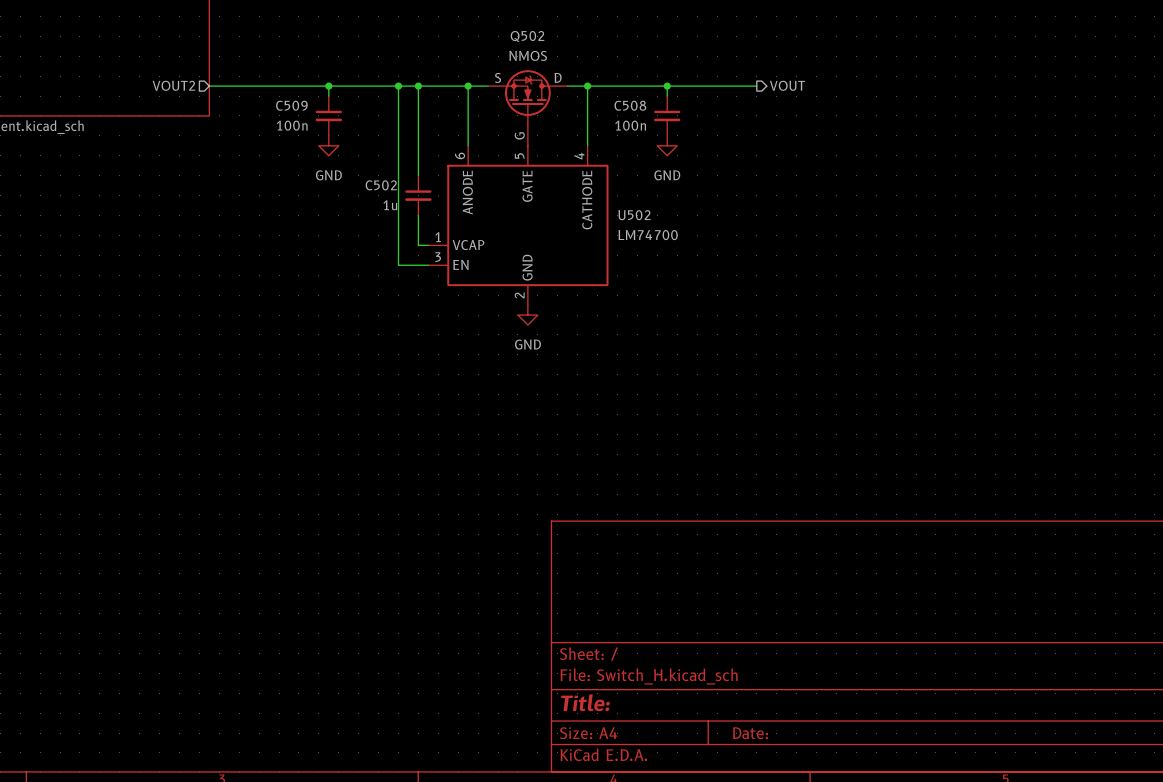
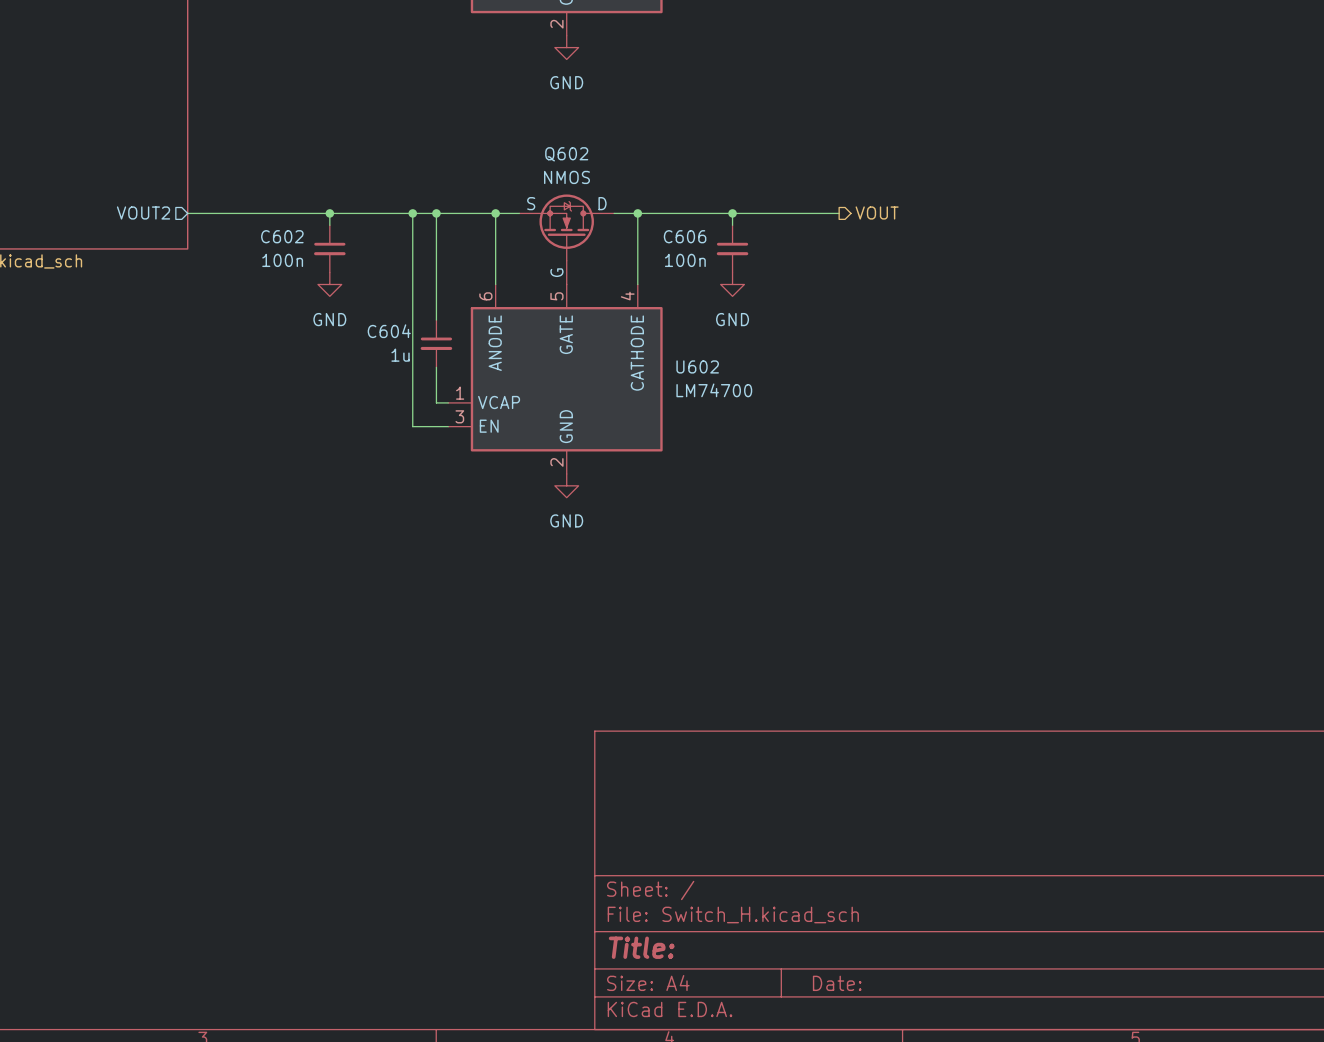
Q502 name: Q502 (527, 36) -> Q602 (566, 154)
C509 name: C509 (291, 105) -> C602 (282, 236)
C508 name: C508 (630, 105) -> C606 (685, 236)
C502 name: C502 (381, 185) -> C604 (389, 331)
U502 name: U502 (634, 215) -> U602 (697, 366)

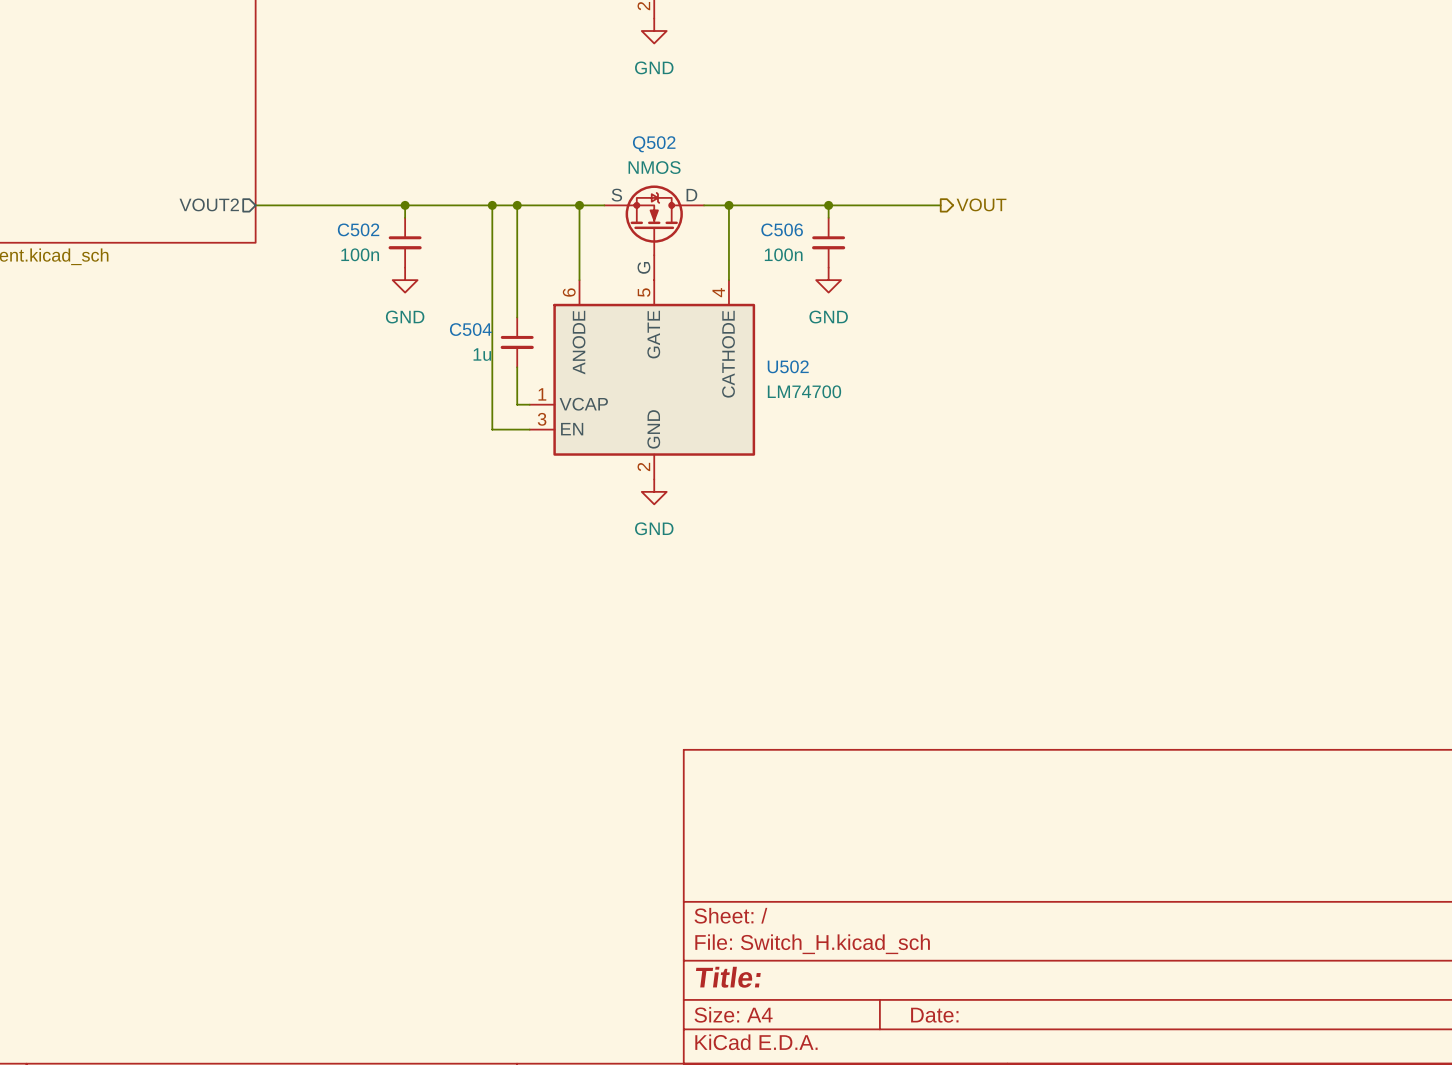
Q602 name: Q602 (566, 154) -> Q502 (654, 144)
C602 name: C602 (282, 236) -> C502 (358, 229)
C606 name: C606 (685, 236) -> C506 (782, 229)
C604 name: C604 (389, 331) -> C504 (470, 329)
U602 name: U602 (697, 366) -> U502 (788, 366)

